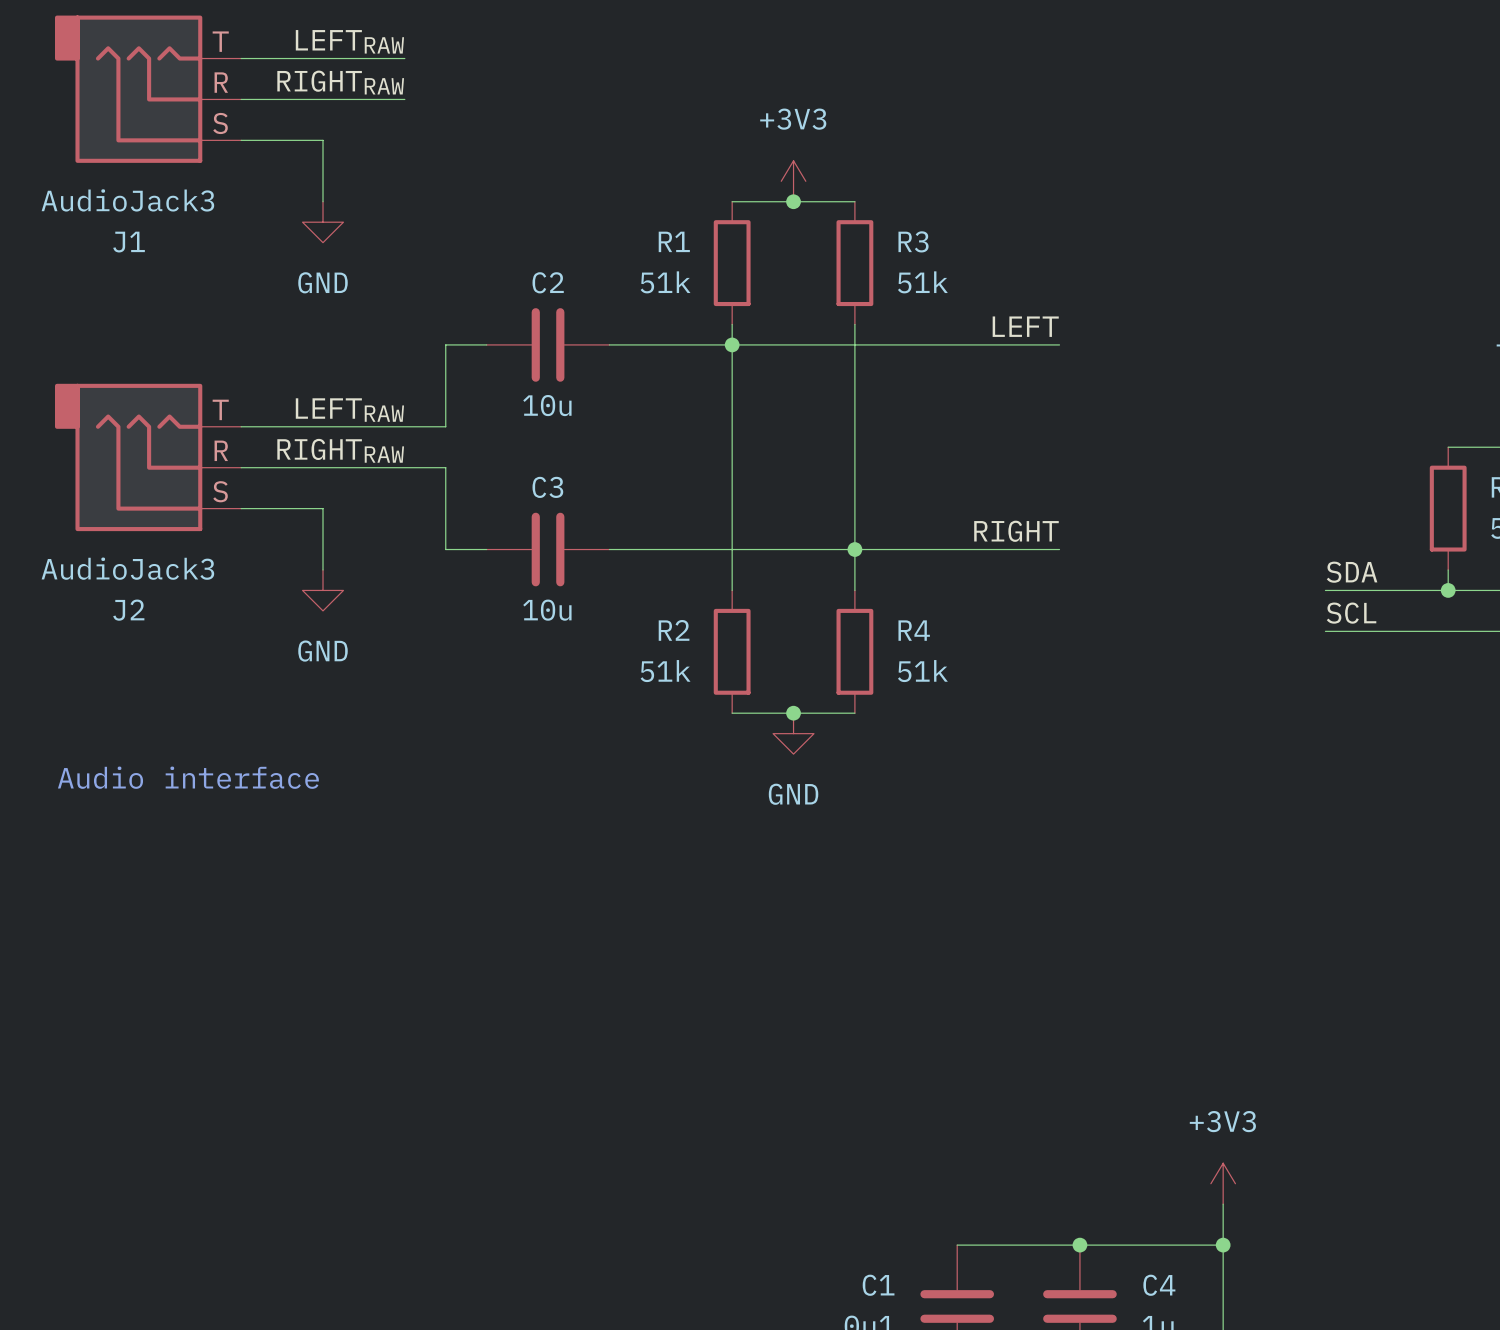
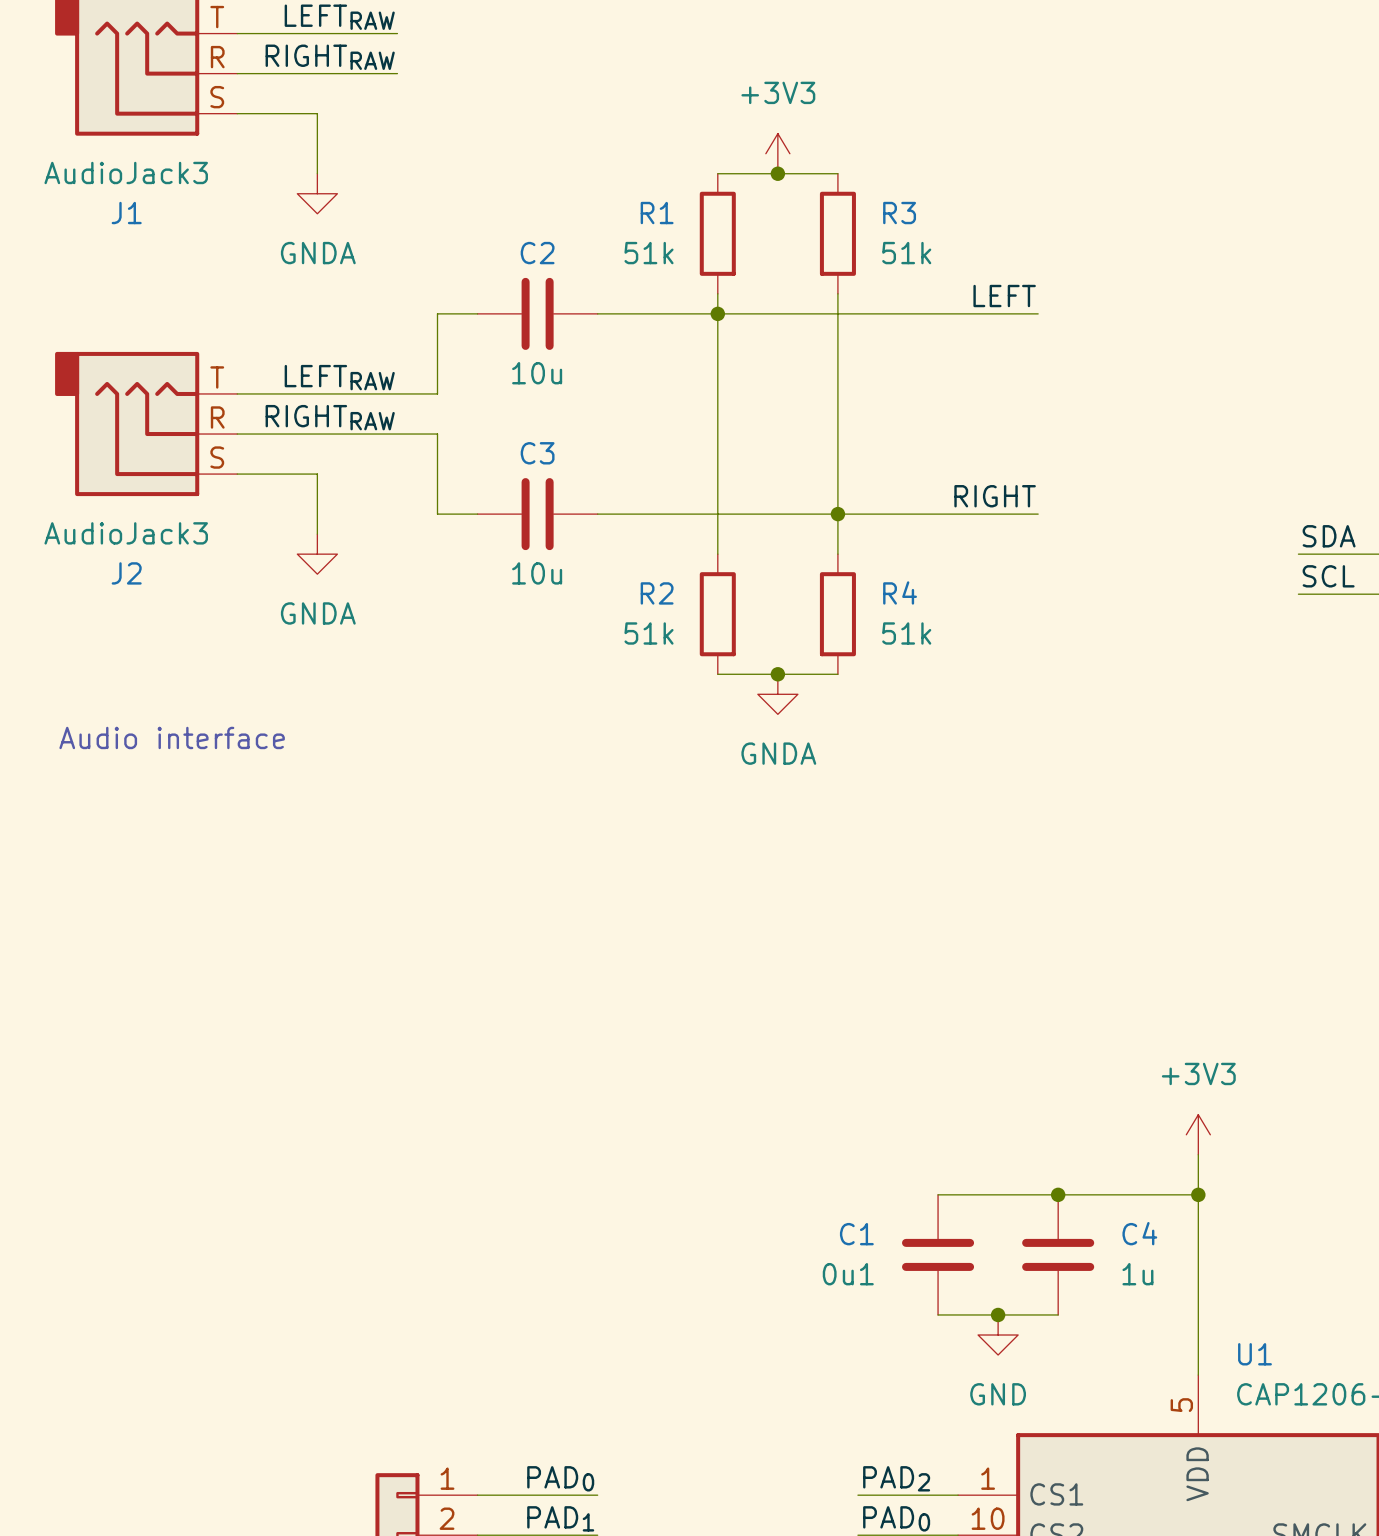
power symbol: GND (323, 222) -> GNDA (317, 193)
power symbol: GND (323, 590) -> GNDA (317, 554)
power symbol: GND (793, 733) -> GNDA (777, 694)

